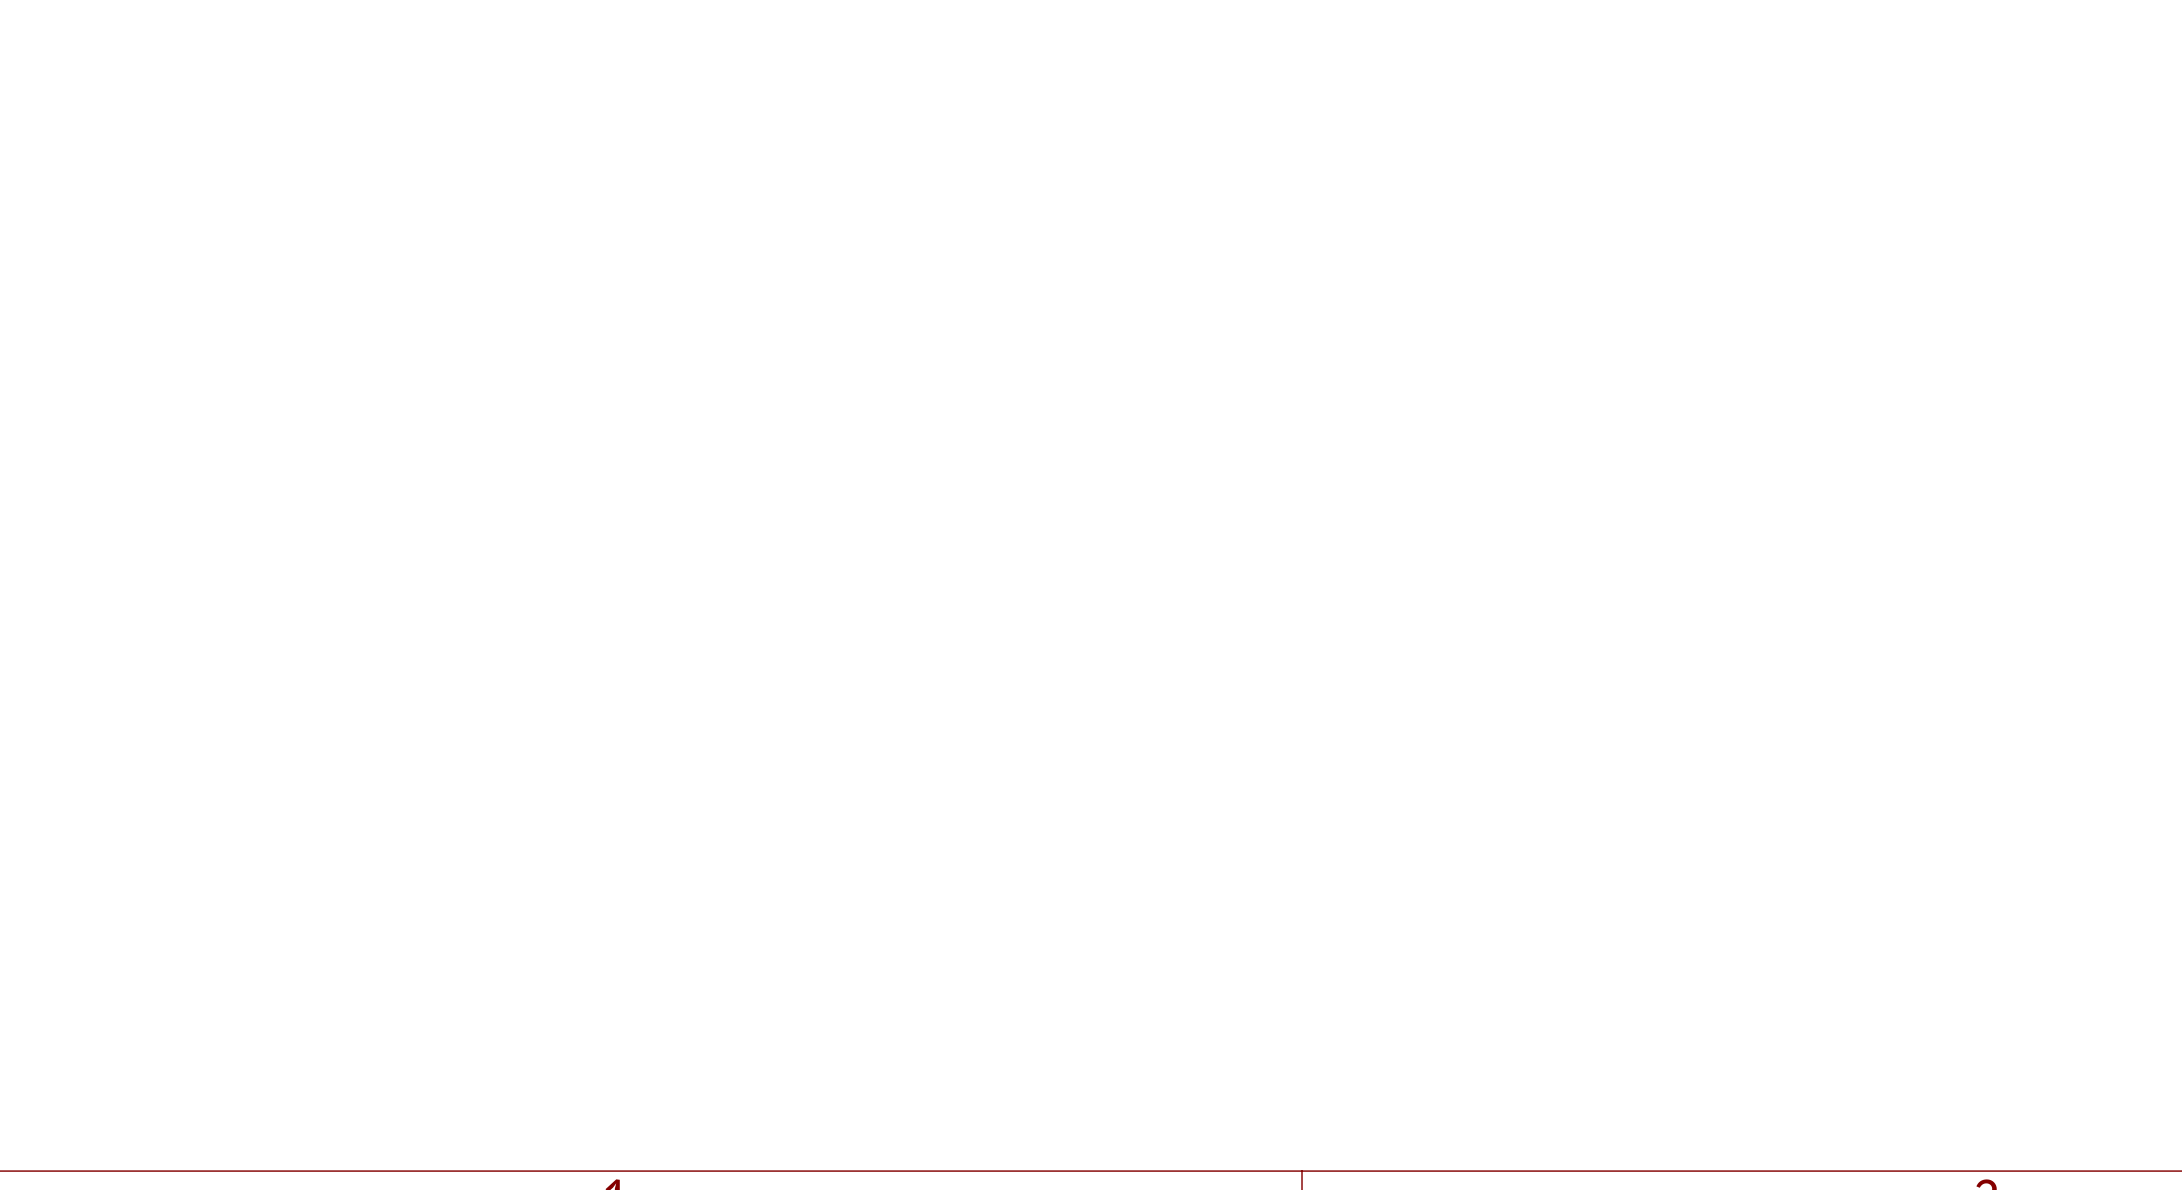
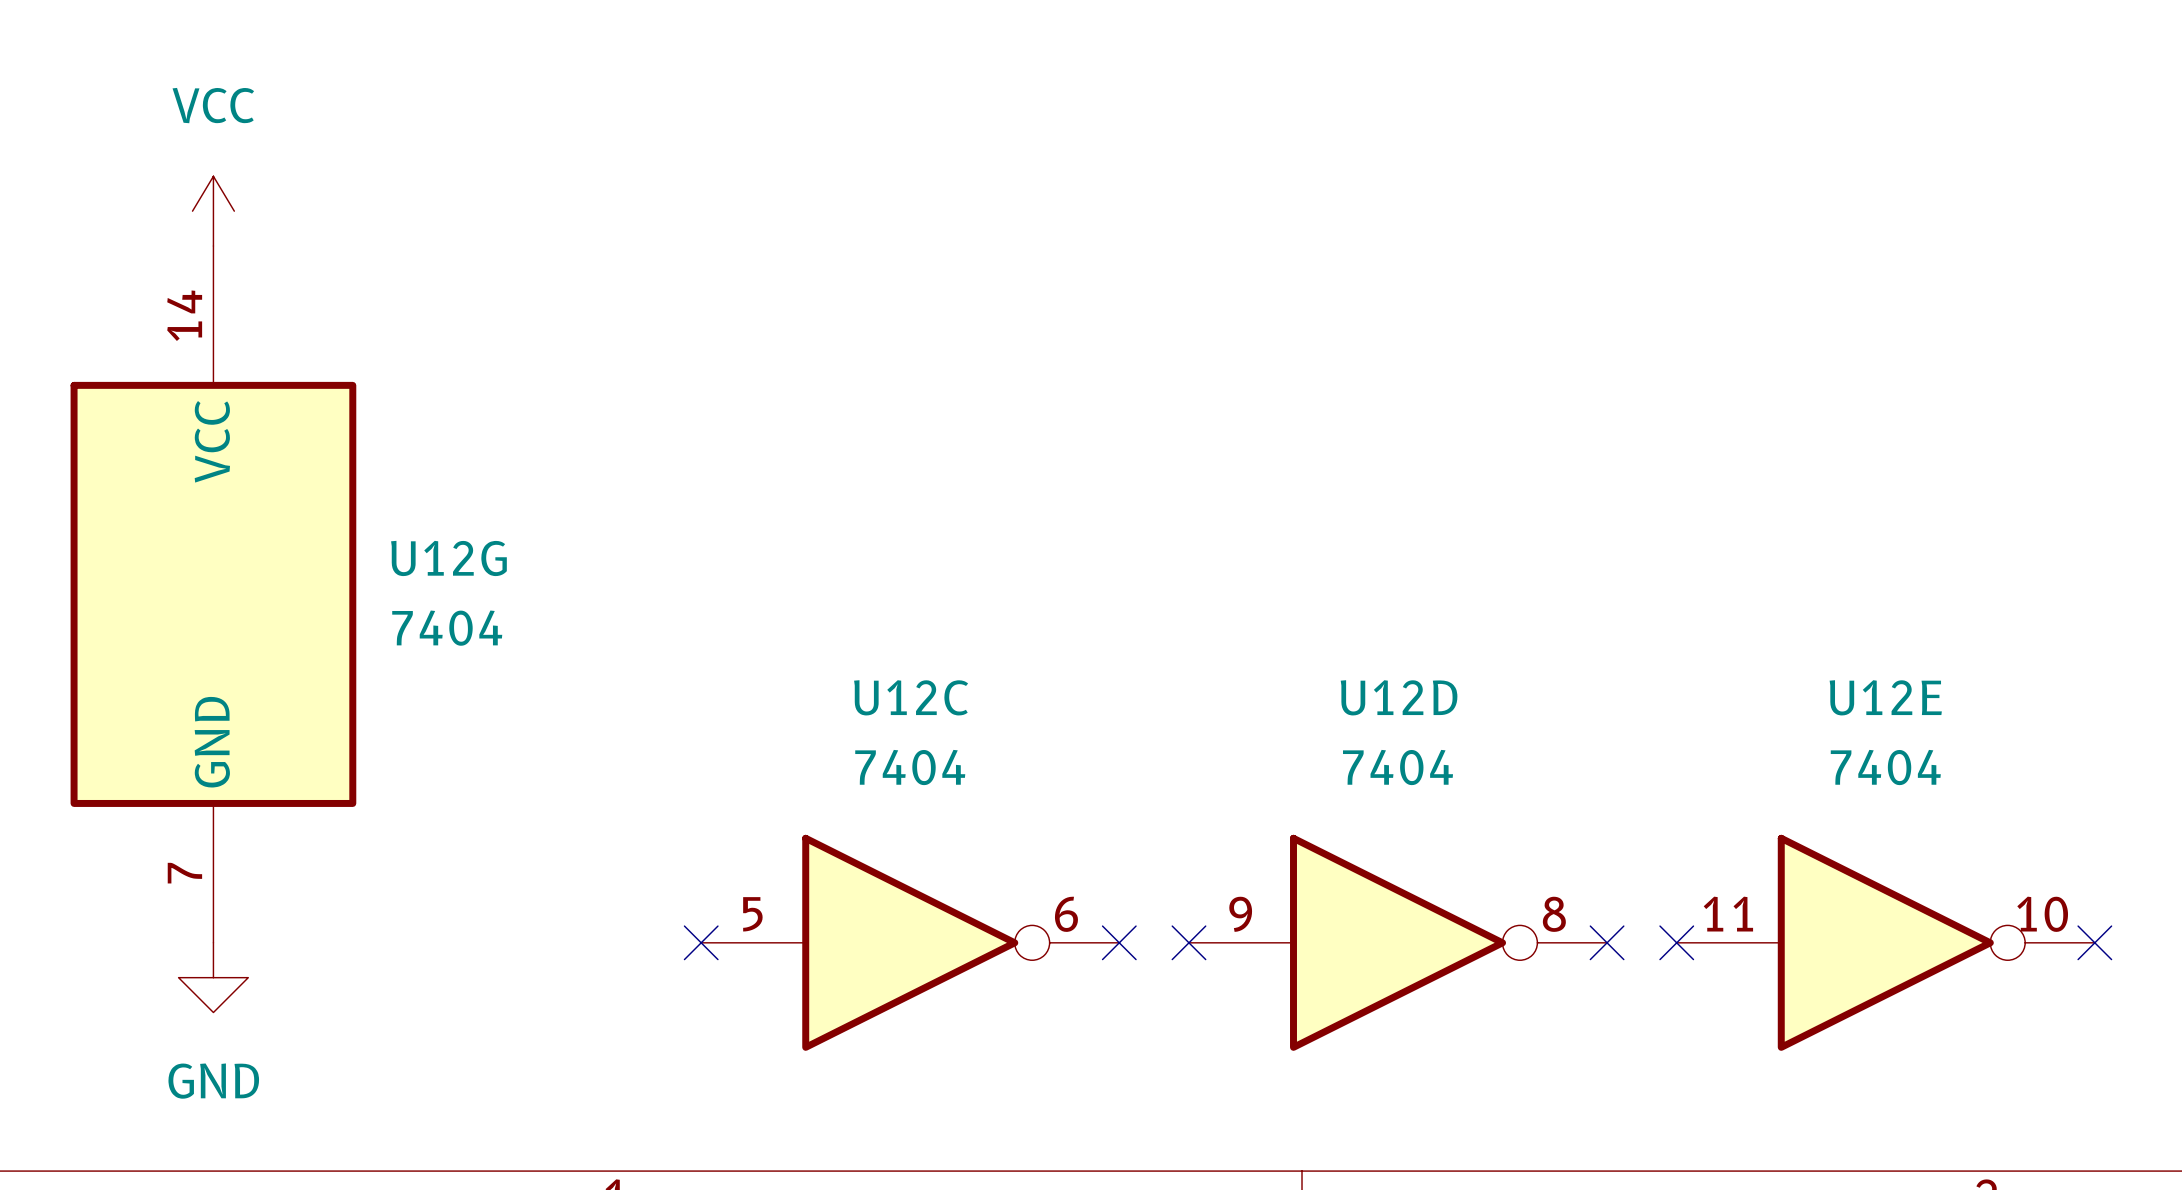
power symbol: none -> VCC (213, 211)
U12G: none -> 7404 (213, 594)
no-connect mark: none -> (701, 942)
U12C: none -> 7404 (910, 942)
no-connect mark: none -> (1119, 942)
no-connect mark: none -> (1188, 942)
U12D: none -> 7404 (1398, 942)
no-connect mark: none -> (1607, 942)
no-connect mark: none -> (1676, 942)
U12E: none -> 7404 (1885, 942)
no-connect mark: none -> (2094, 942)
power symbol: none -> GND (213, 977)

